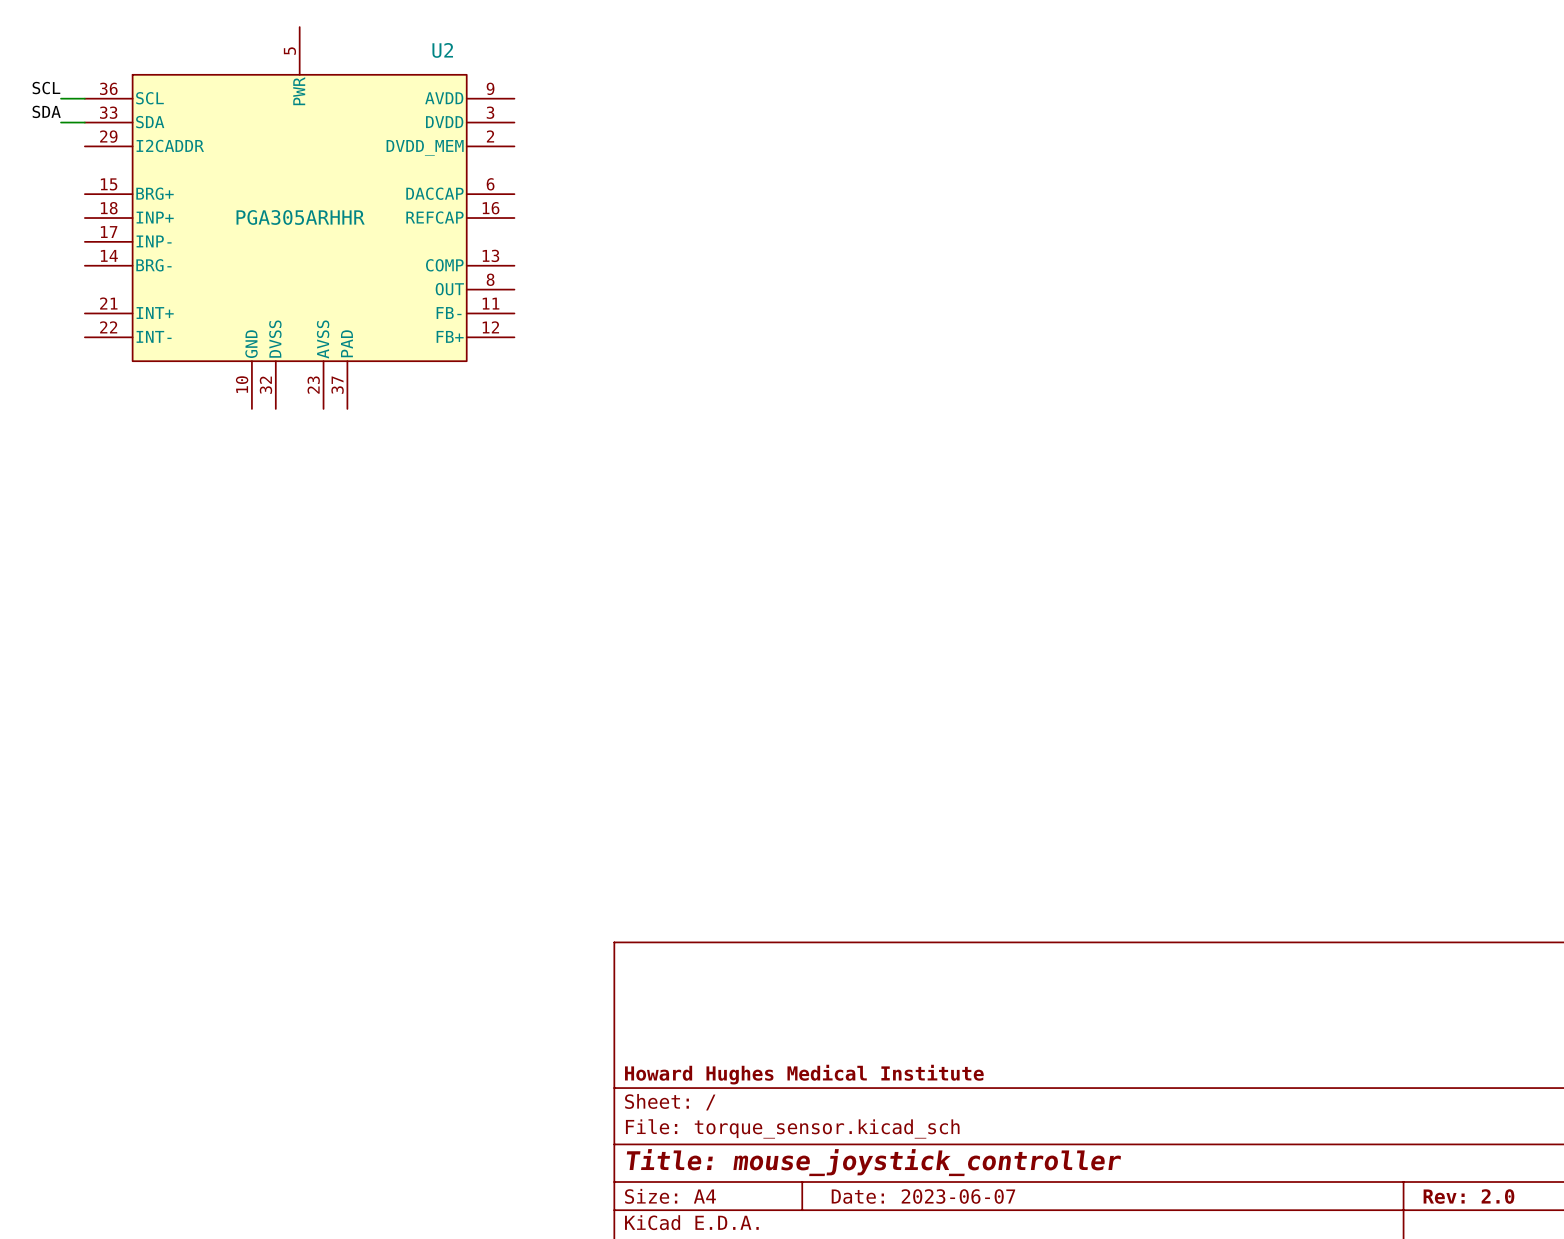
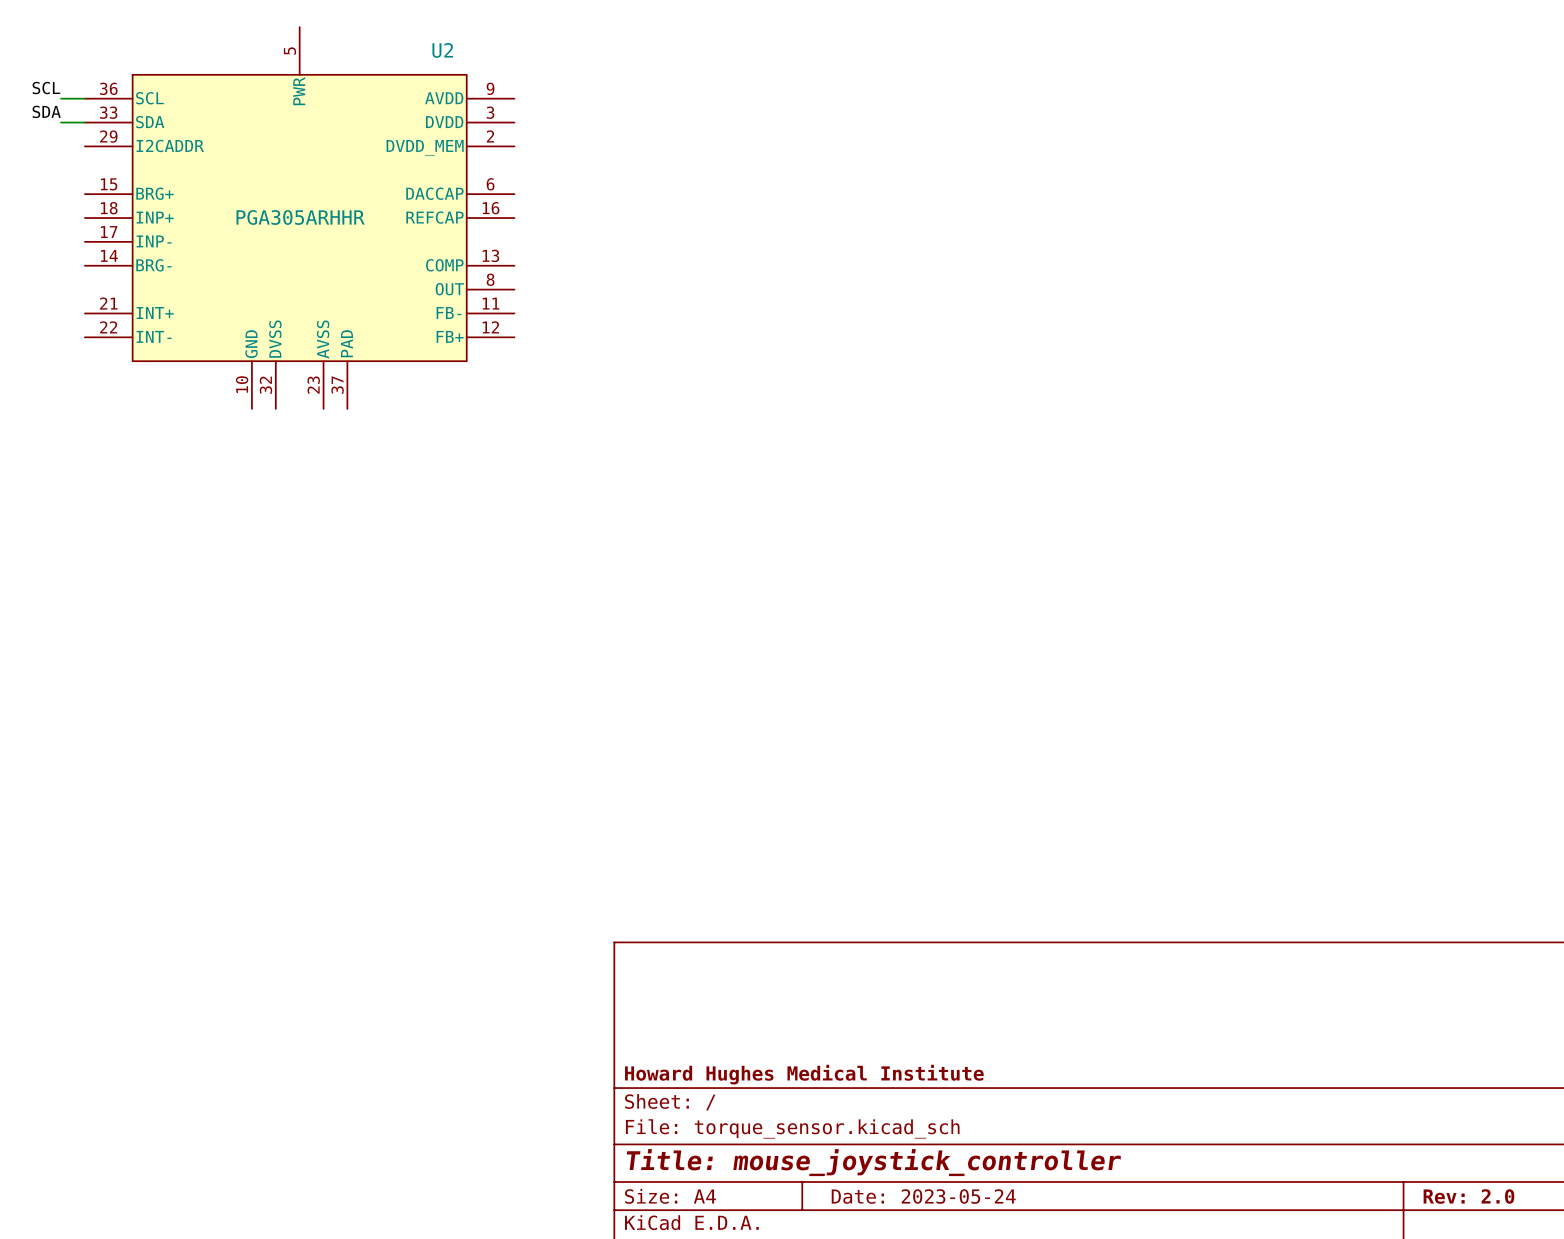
title block: Date: 2023-06-07 (923, 1196) -> Date: 2023-05-24 (923, 1196)

